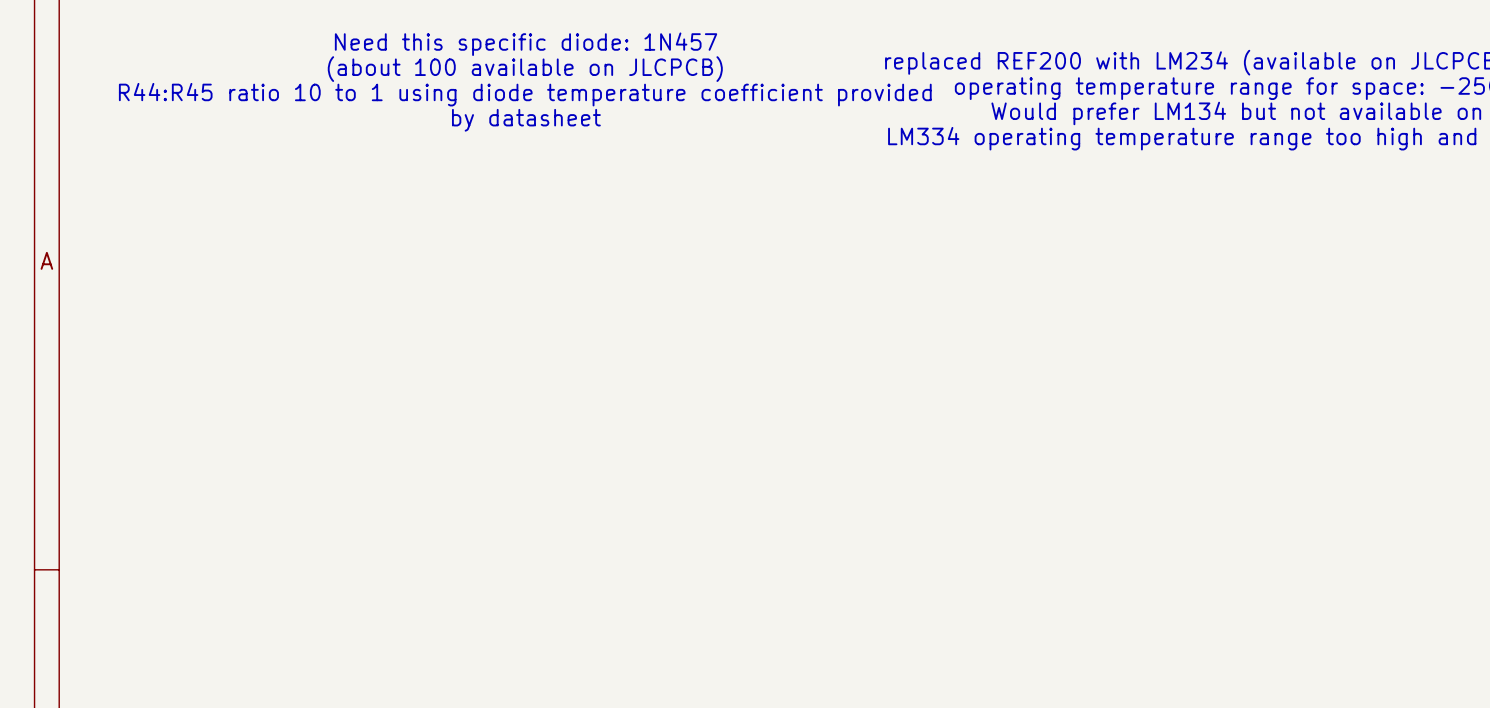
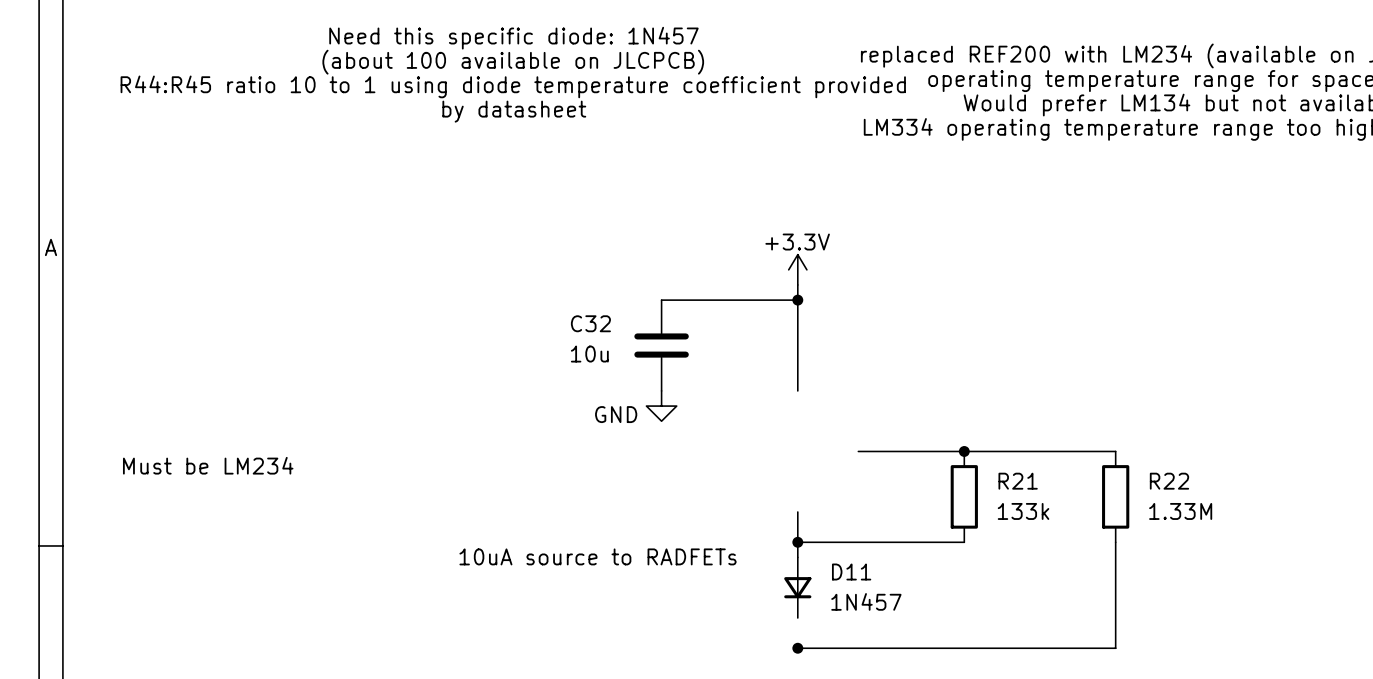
power symbol: none -> +3.3V (797, 269)
wire: none -> (797, 284) (797, 390)
wire: none -> (661, 300) (797, 300)
junction: none -> (797, 300)
C32: none -> 10u (661, 345)
power symbol: none -> GND (661, 406)
wire: none -> (858, 451) (1115, 451)
junction: none -> (964, 451)
text: none -> Must be LM234 (208, 465)
R21: none -> 133k (964, 496)
R22: none -> 1.33M (1115, 496)
wire: none -> (797, 512) (797, 557)
wire: none -> (797, 542) (964, 542)
junction: none -> (797, 542)
wire: none -> (1115, 542) (1115, 648) (797, 648)
text: none -> 10uA source to RADFETs (598, 556)
D11: none -> 1N457 (797, 587)
junction: none -> (797, 648)

